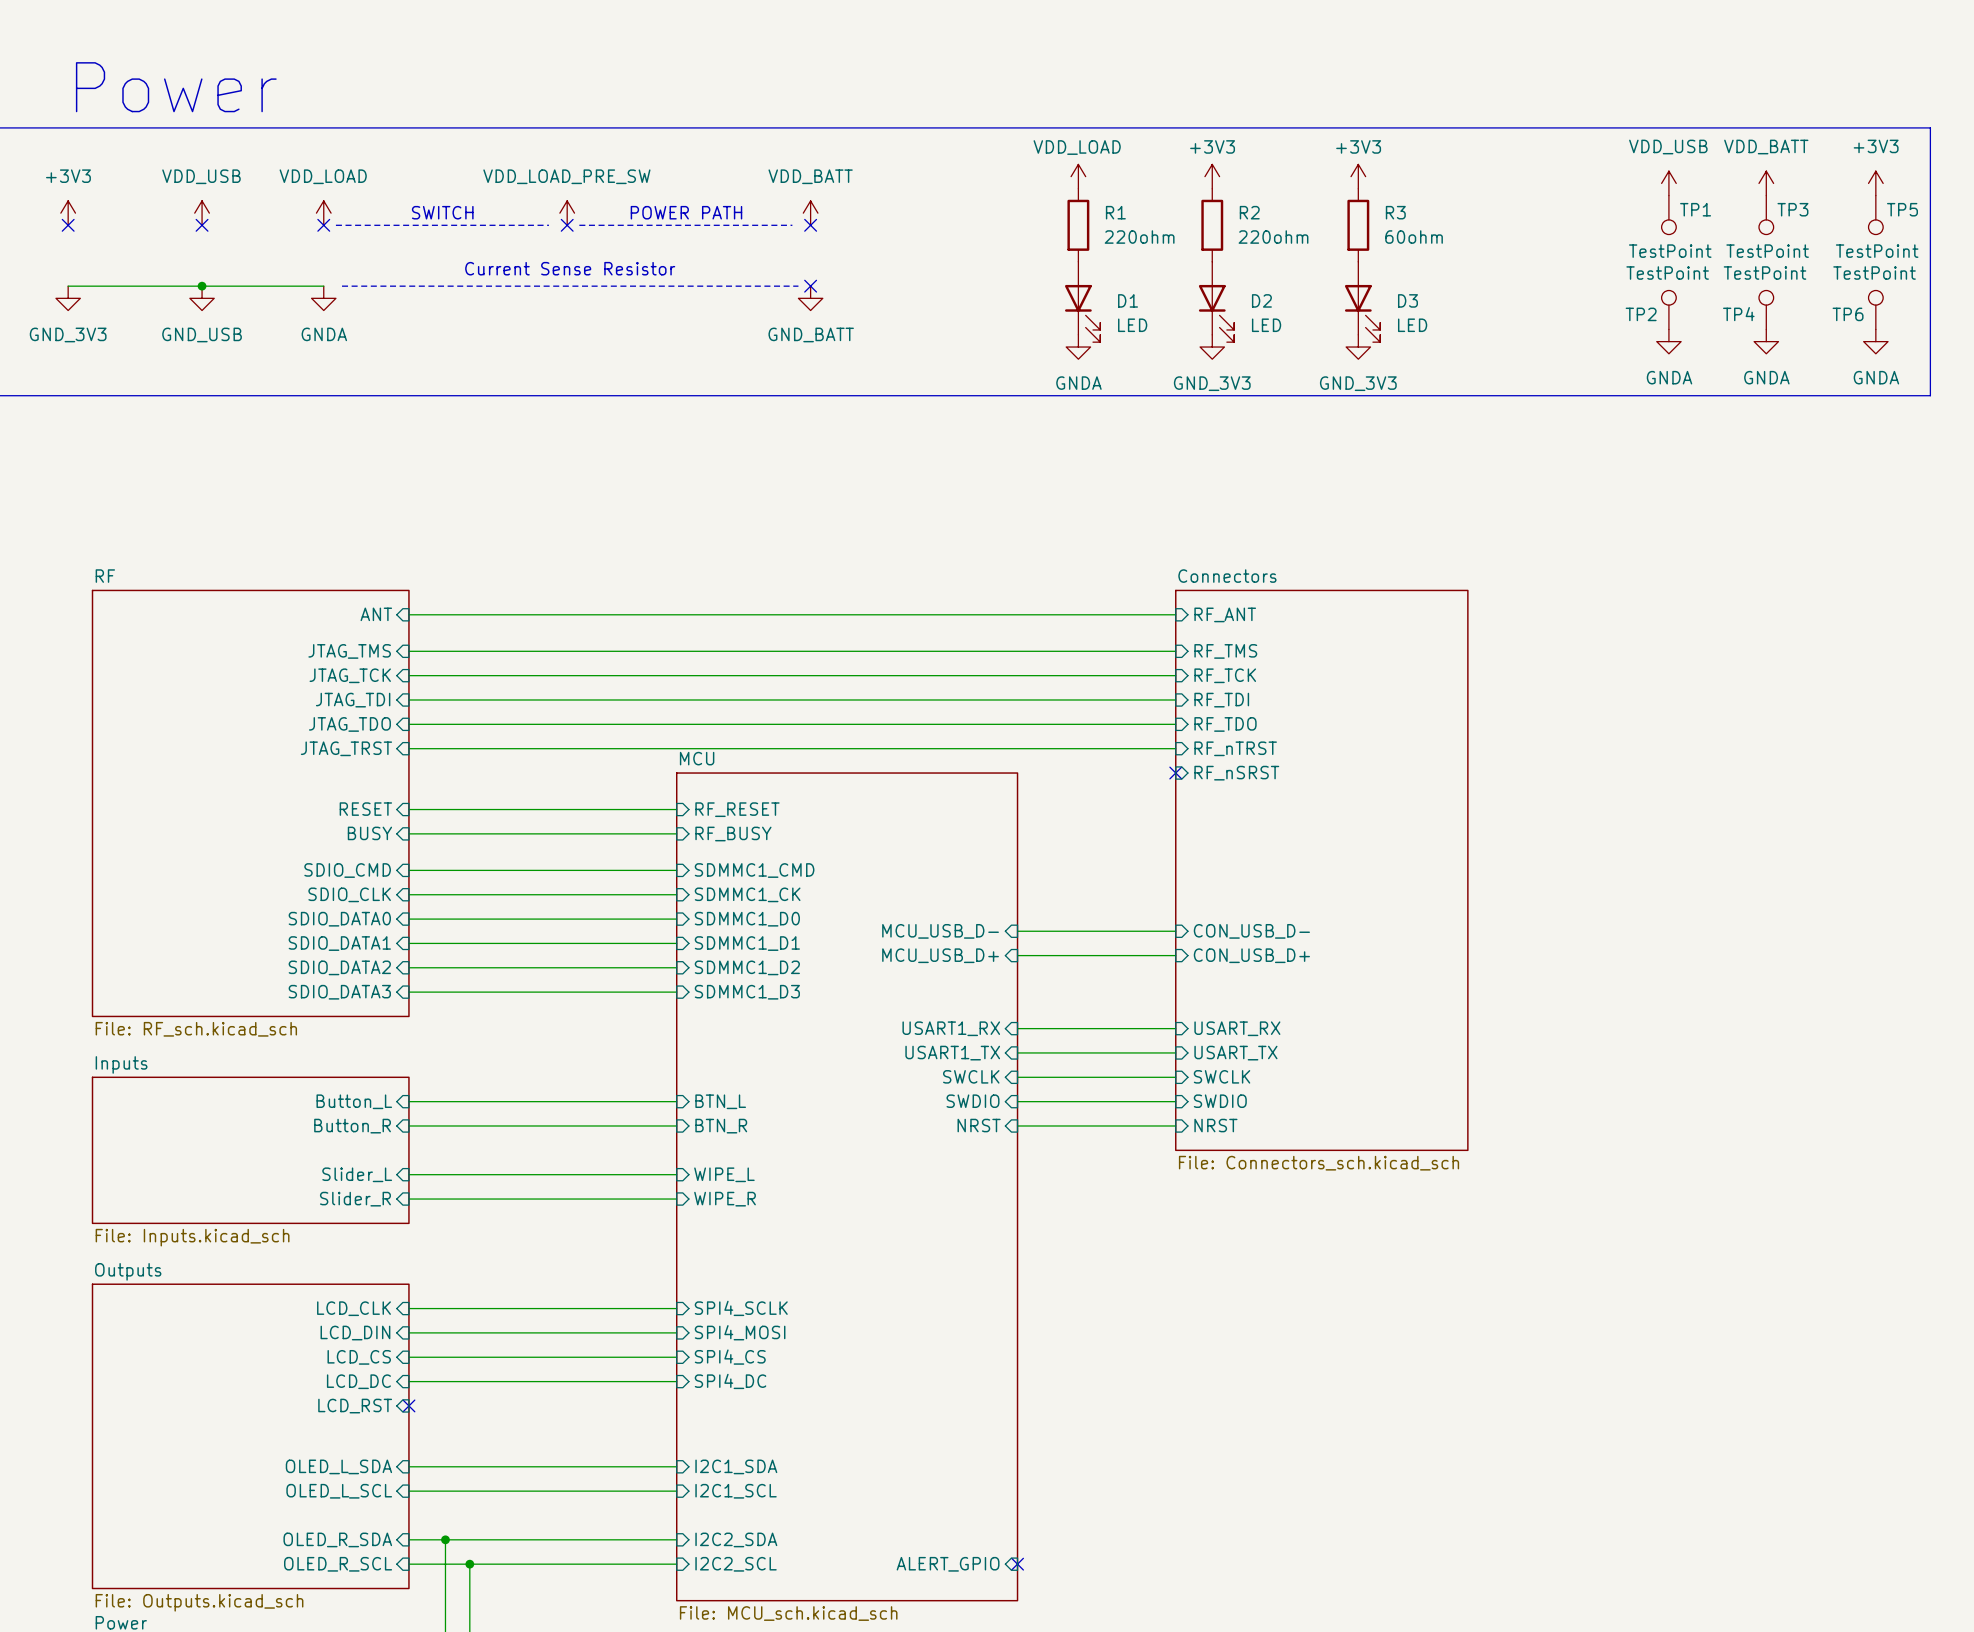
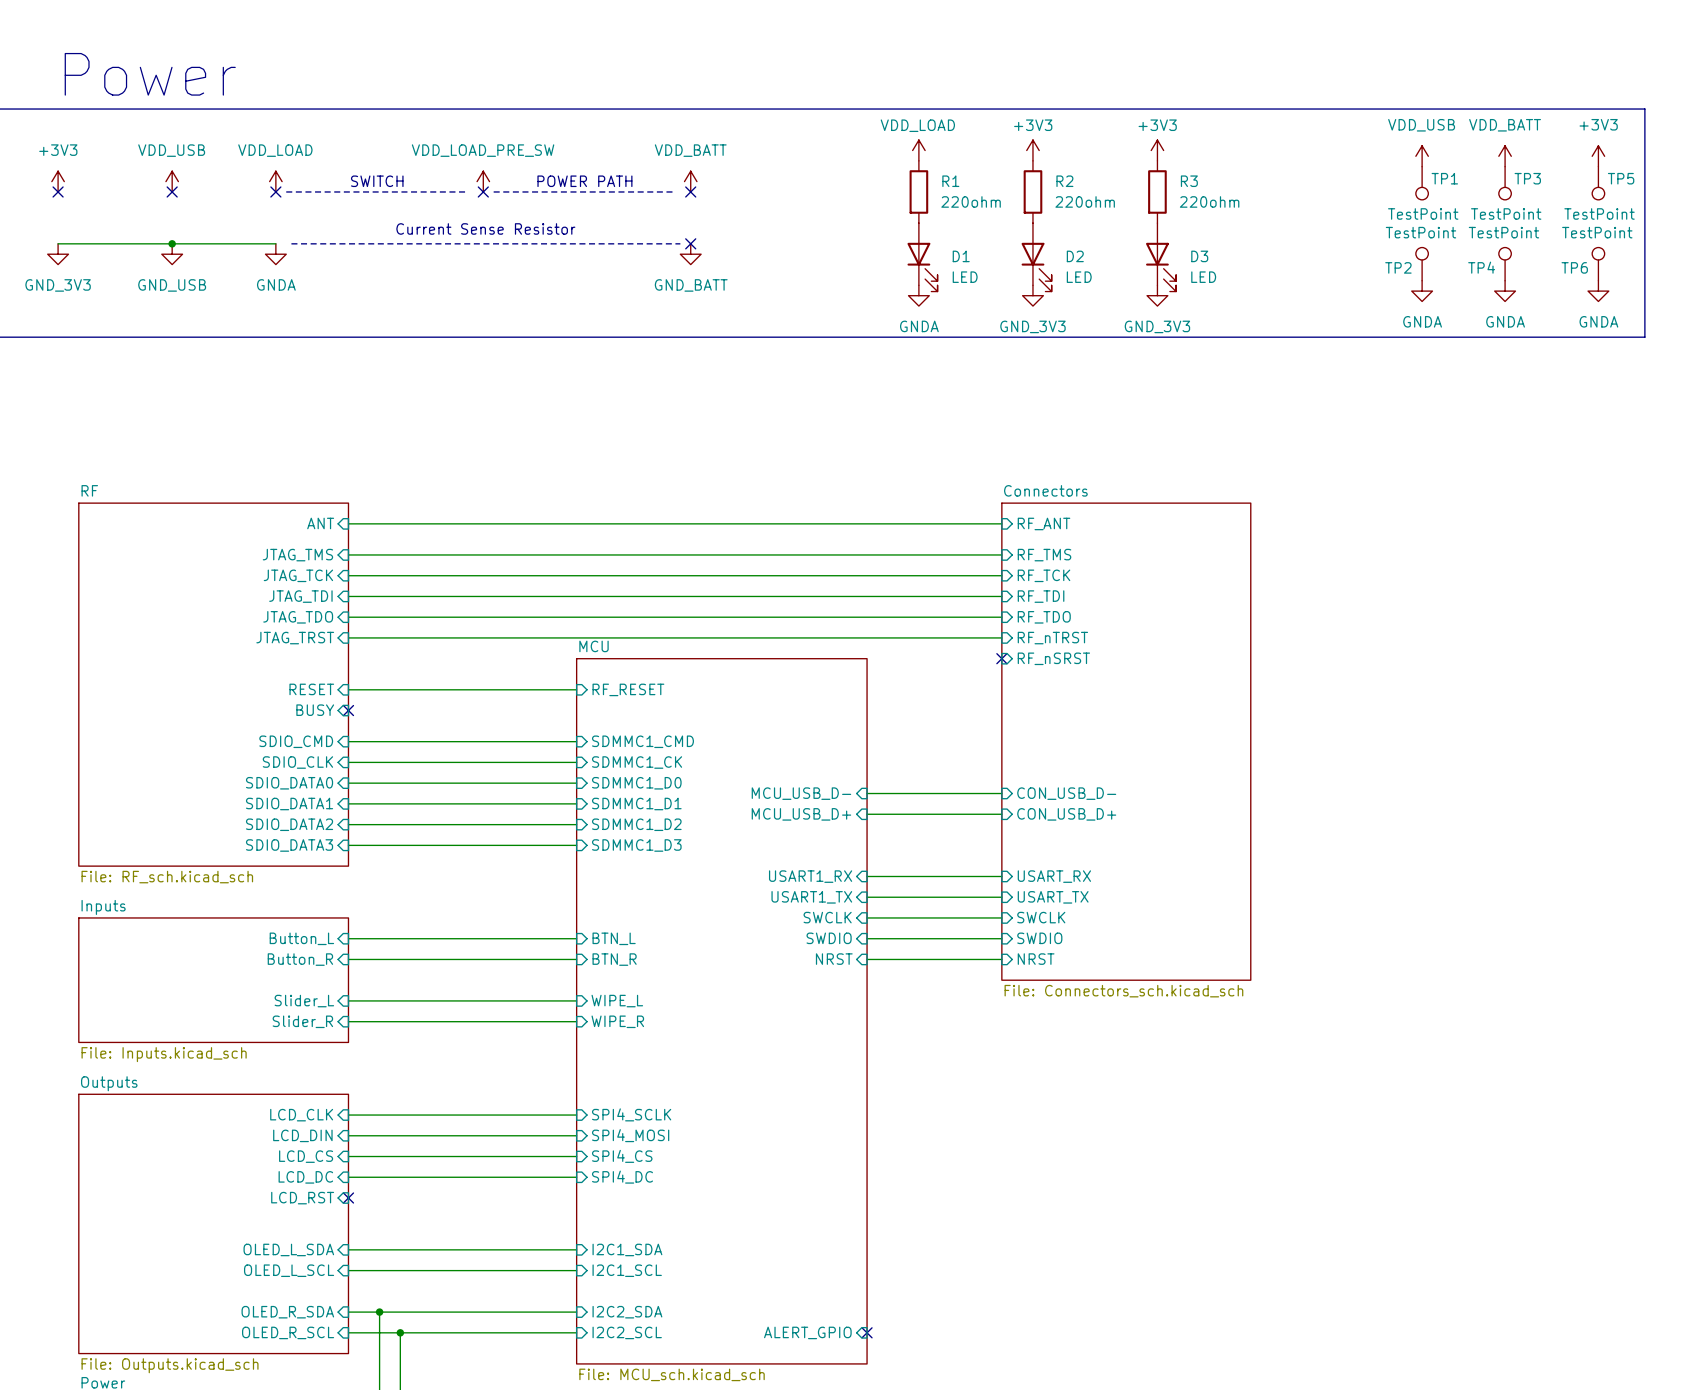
R3 value: 60ohm (1414, 237) -> 220ohm (1209, 201)
wire: (408, 833) (676, 833) -> none
no-connect mark: none -> (348, 710)
sheet pin: RF_BUSY (733, 834) -> none

